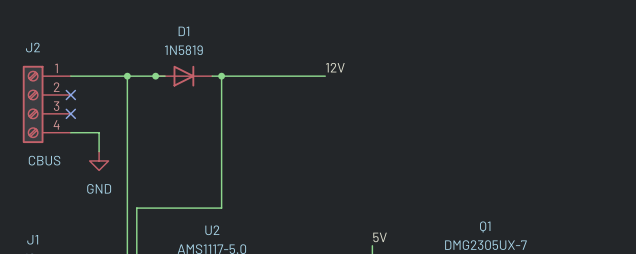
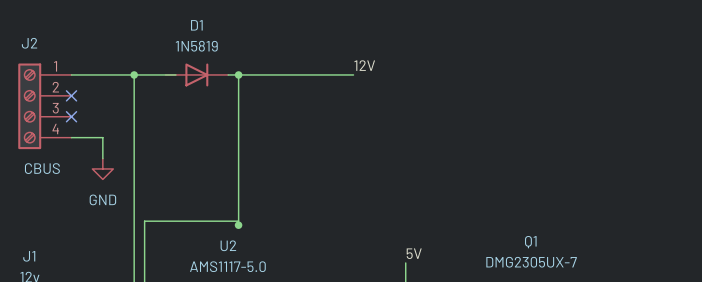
junction: (155, 76) -> none
junction: none -> (238, 225)

